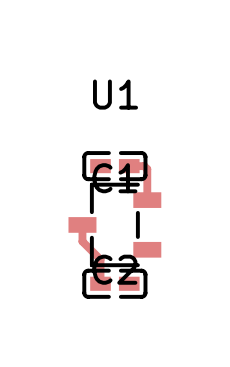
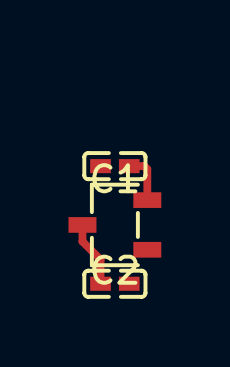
U1 name: U1 (115, 94) -> none

